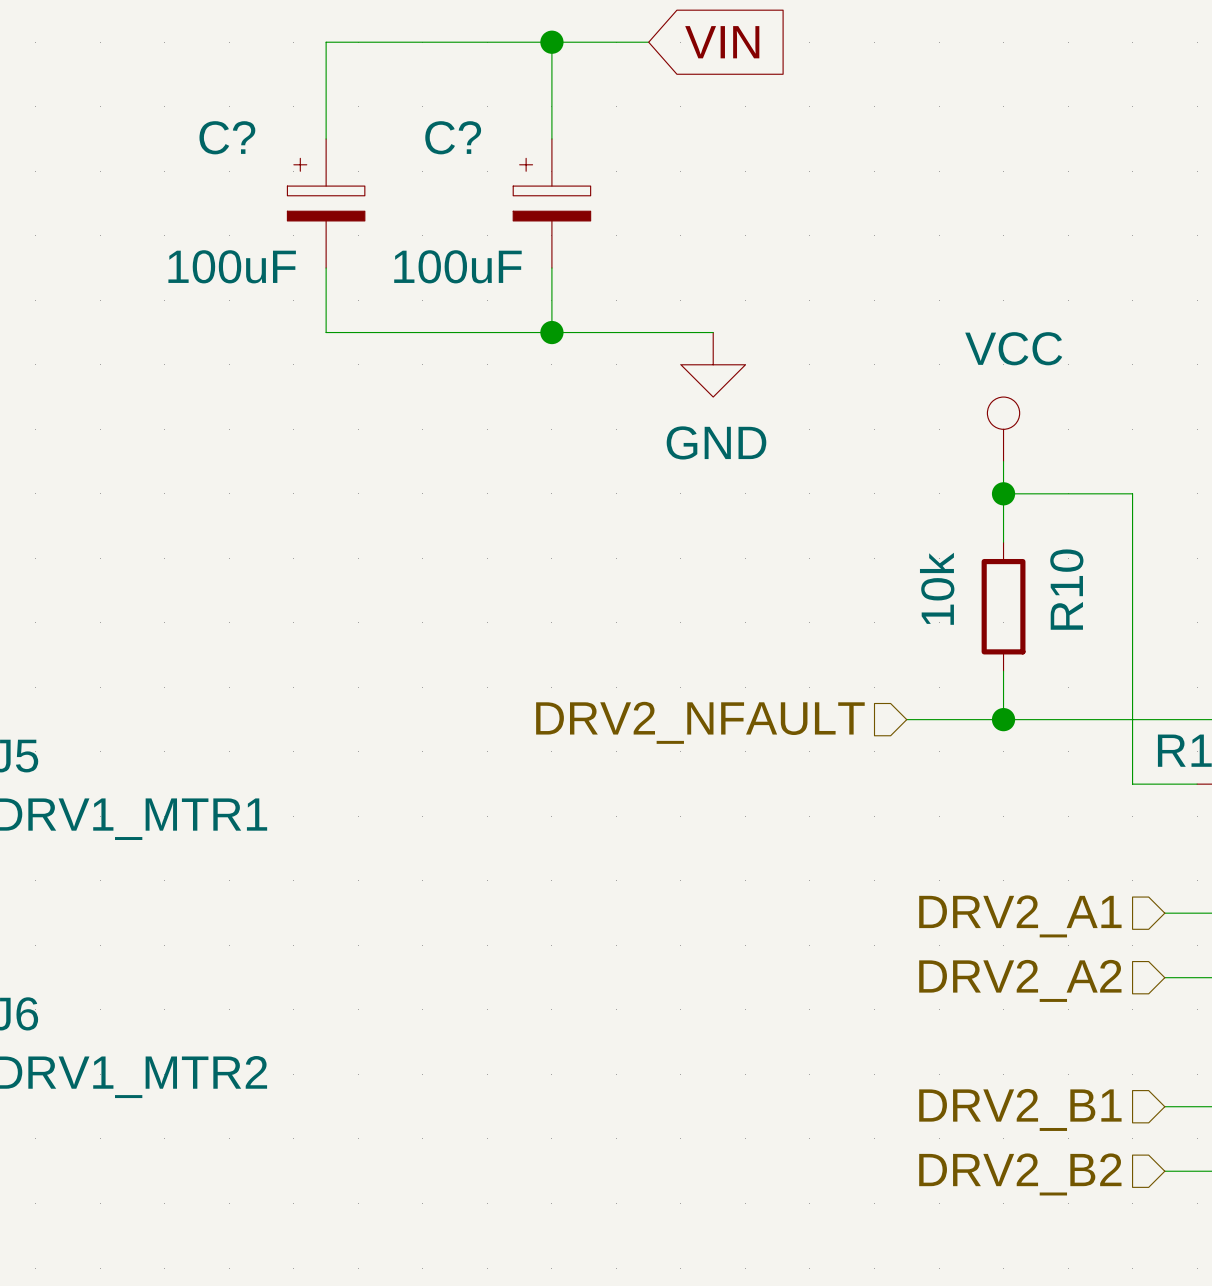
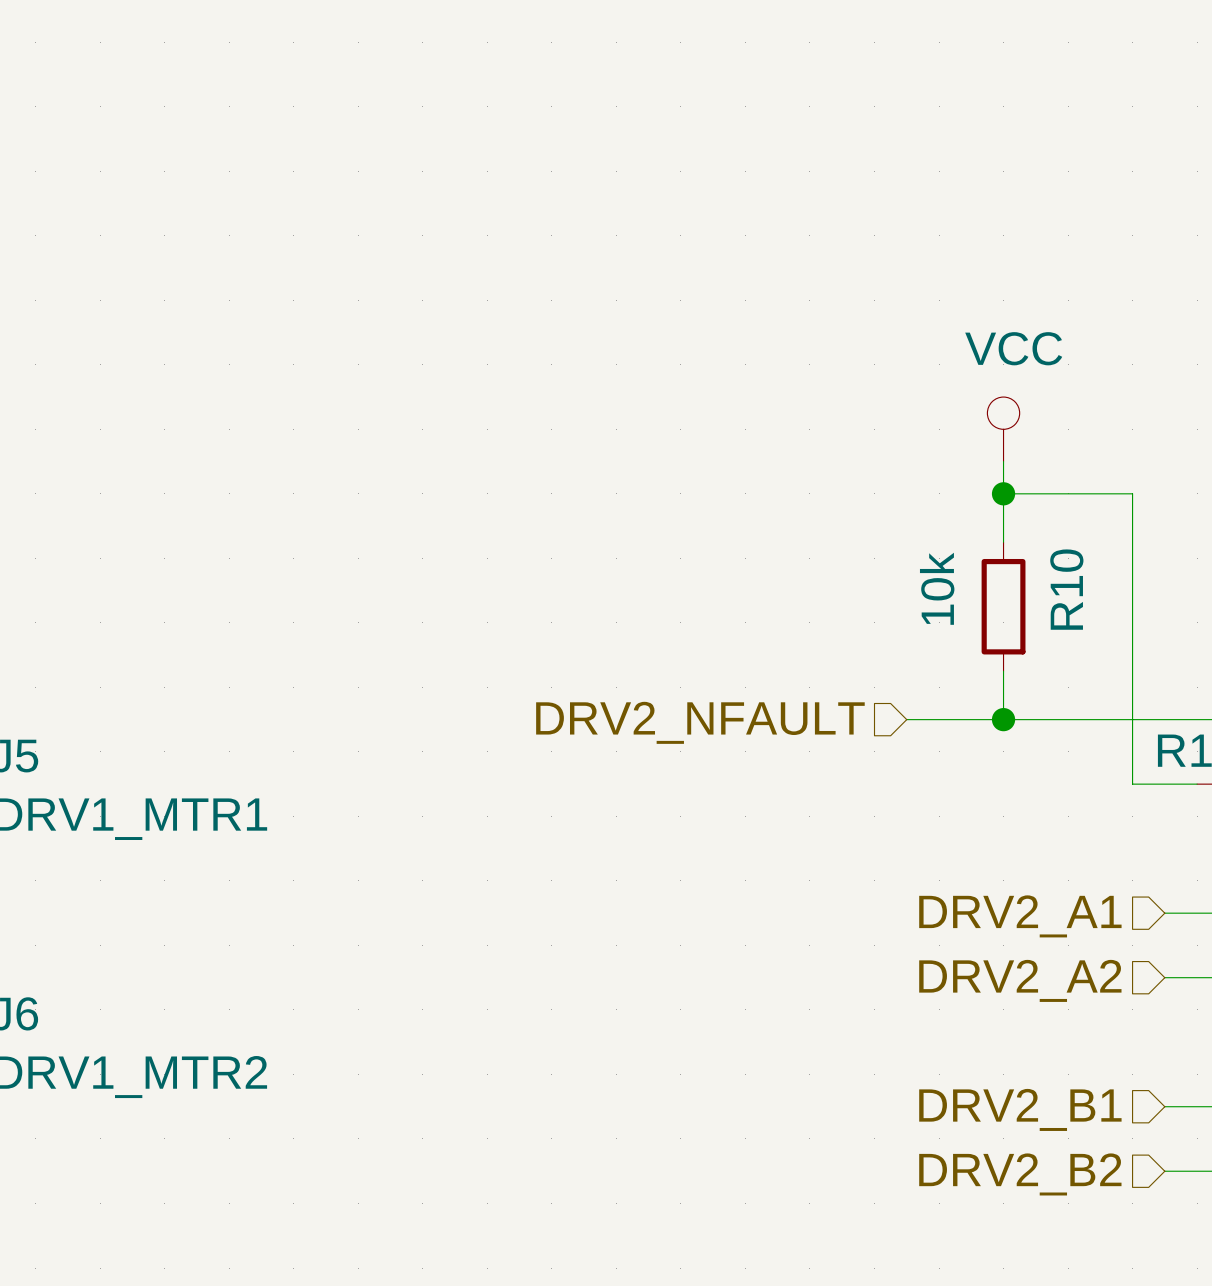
wire: (551, 42) (551, 138) -> none
junction: (551, 42) -> none
wire: (648, 42) (326, 42) (326, 138) -> none
global label: VIN (722, 42) -> none
C?: 100uF (326, 203) -> none
C?: 100uF (551, 203) -> none
wire: (326, 268) (326, 332) (713, 332) -> none
wire: (551, 268) (551, 332) -> none
junction: (551, 332) -> none
power symbol: GND (713, 364) -> none

